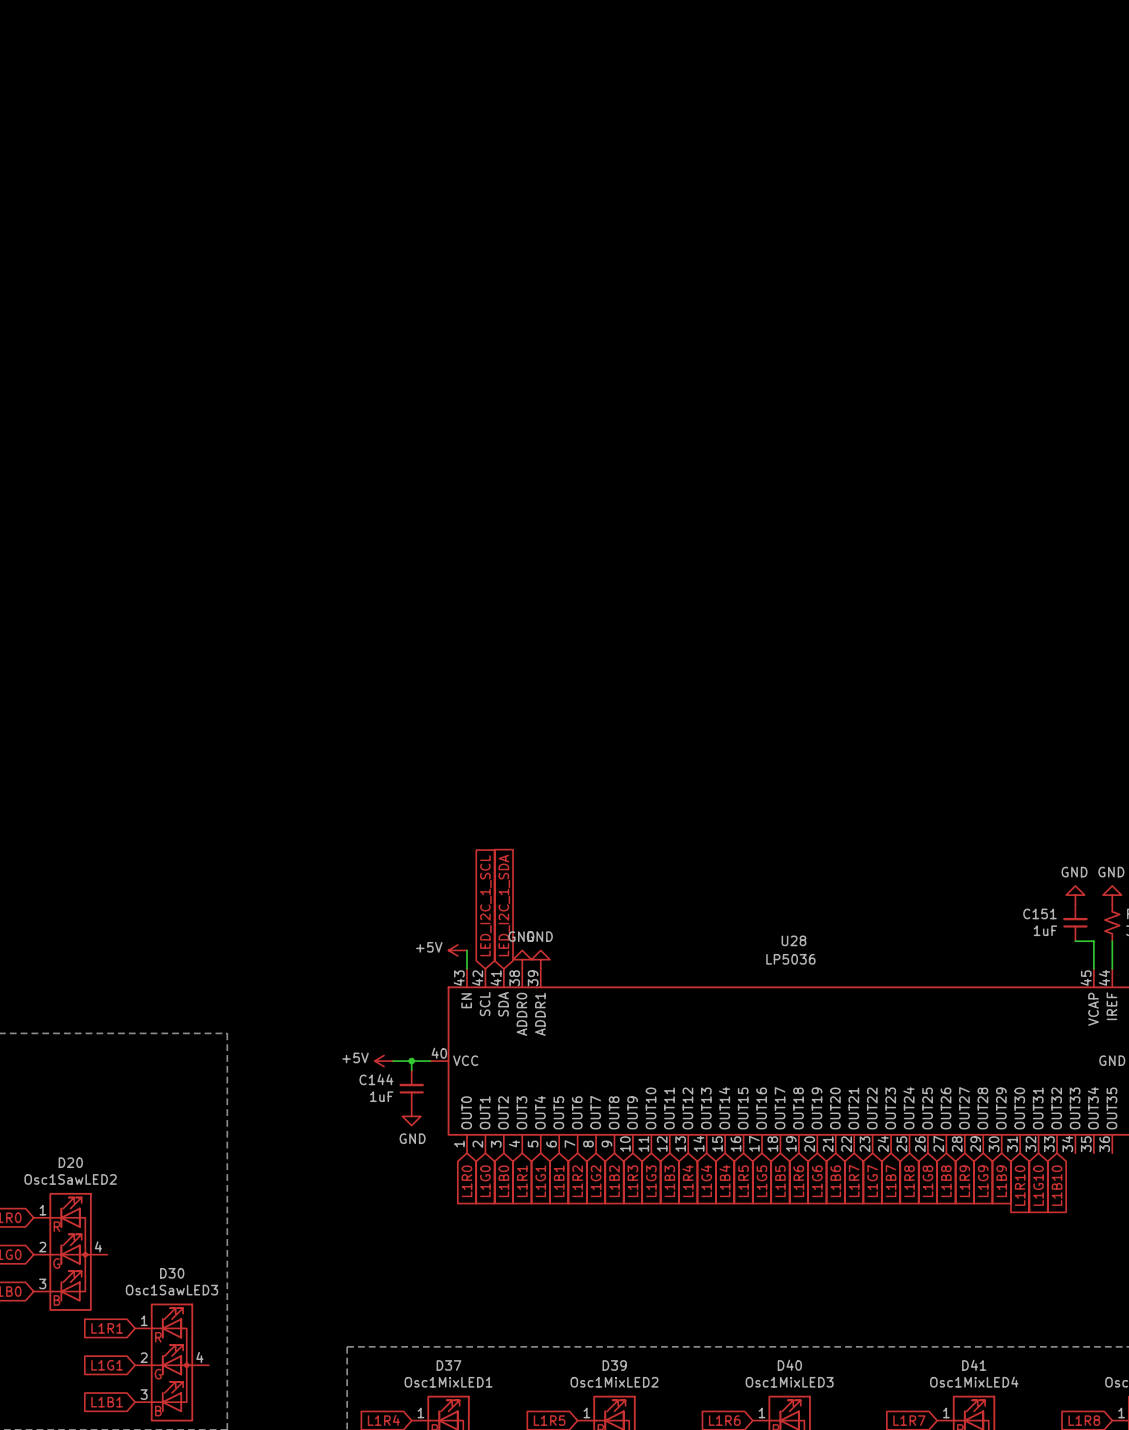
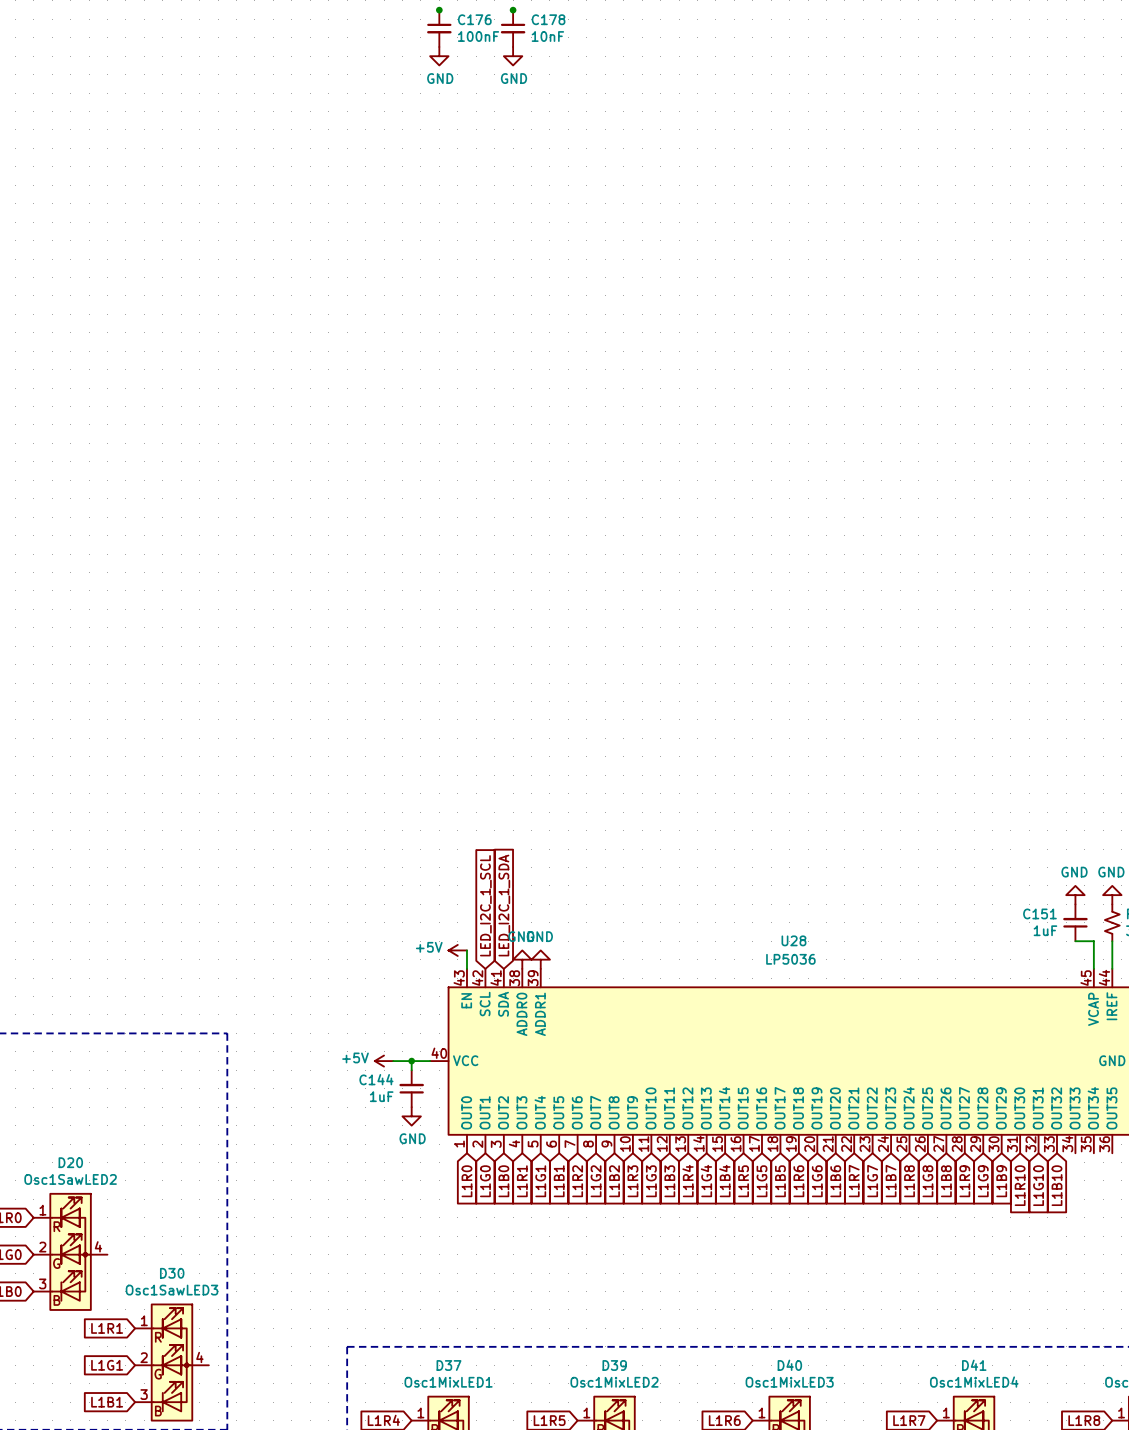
junction: none -> (439, 10)
junction: none -> (513, 10)
C176: none -> 100nF (439, 28)
C178: none -> 10nF (513, 28)
power symbol: none -> GND (439, 56)
power symbol: none -> GND (513, 56)

